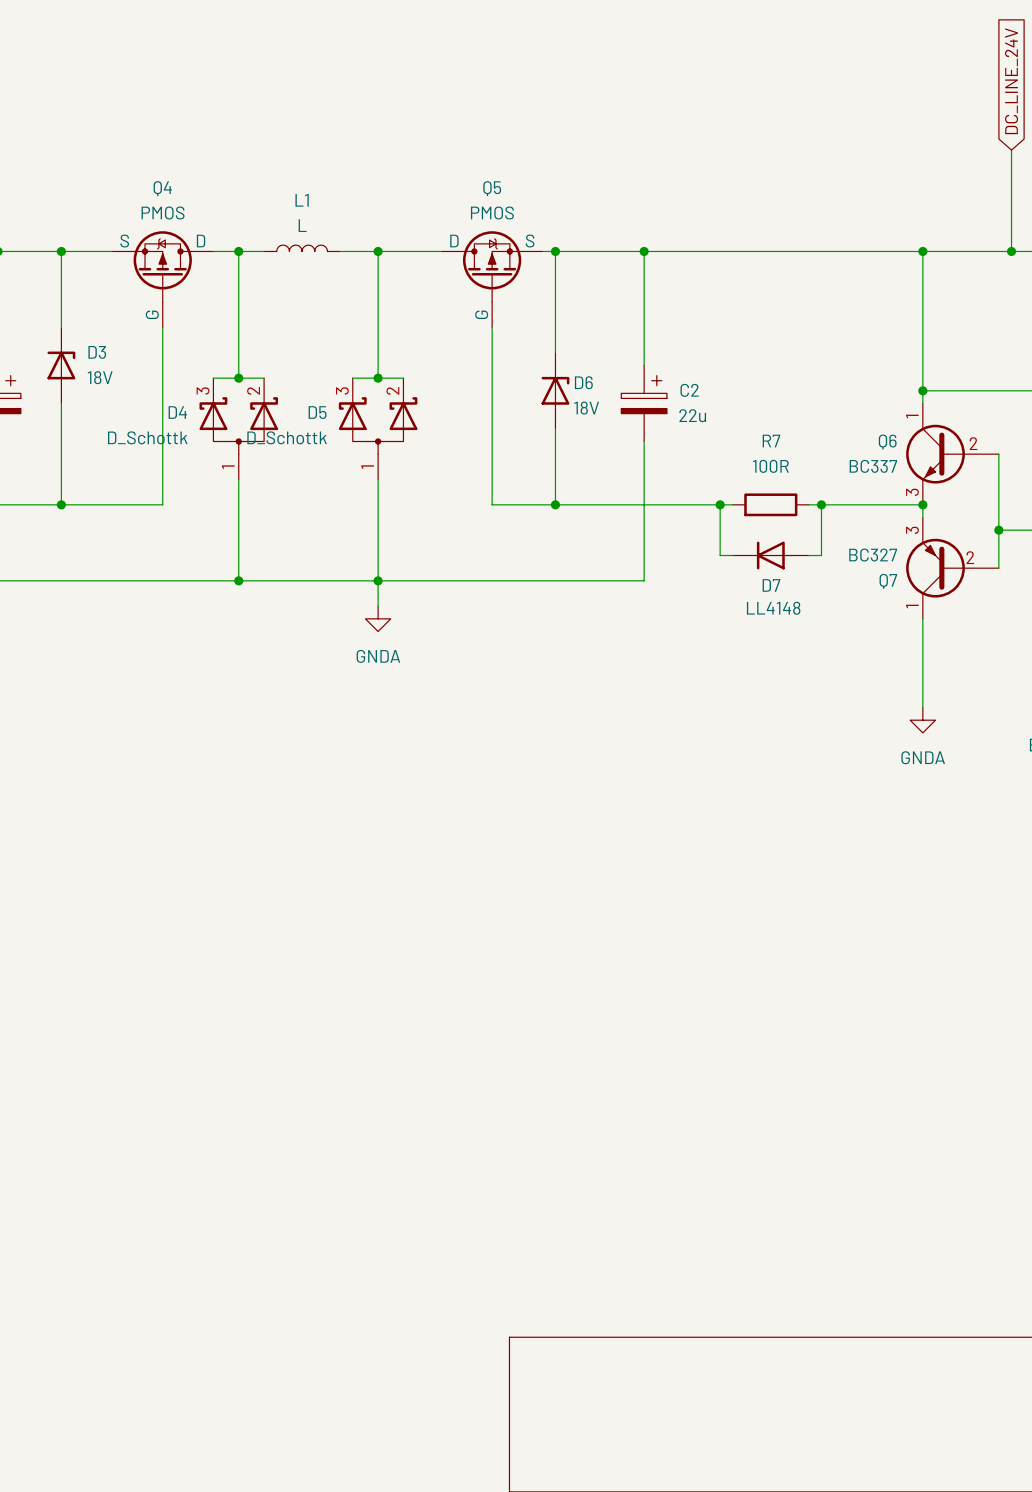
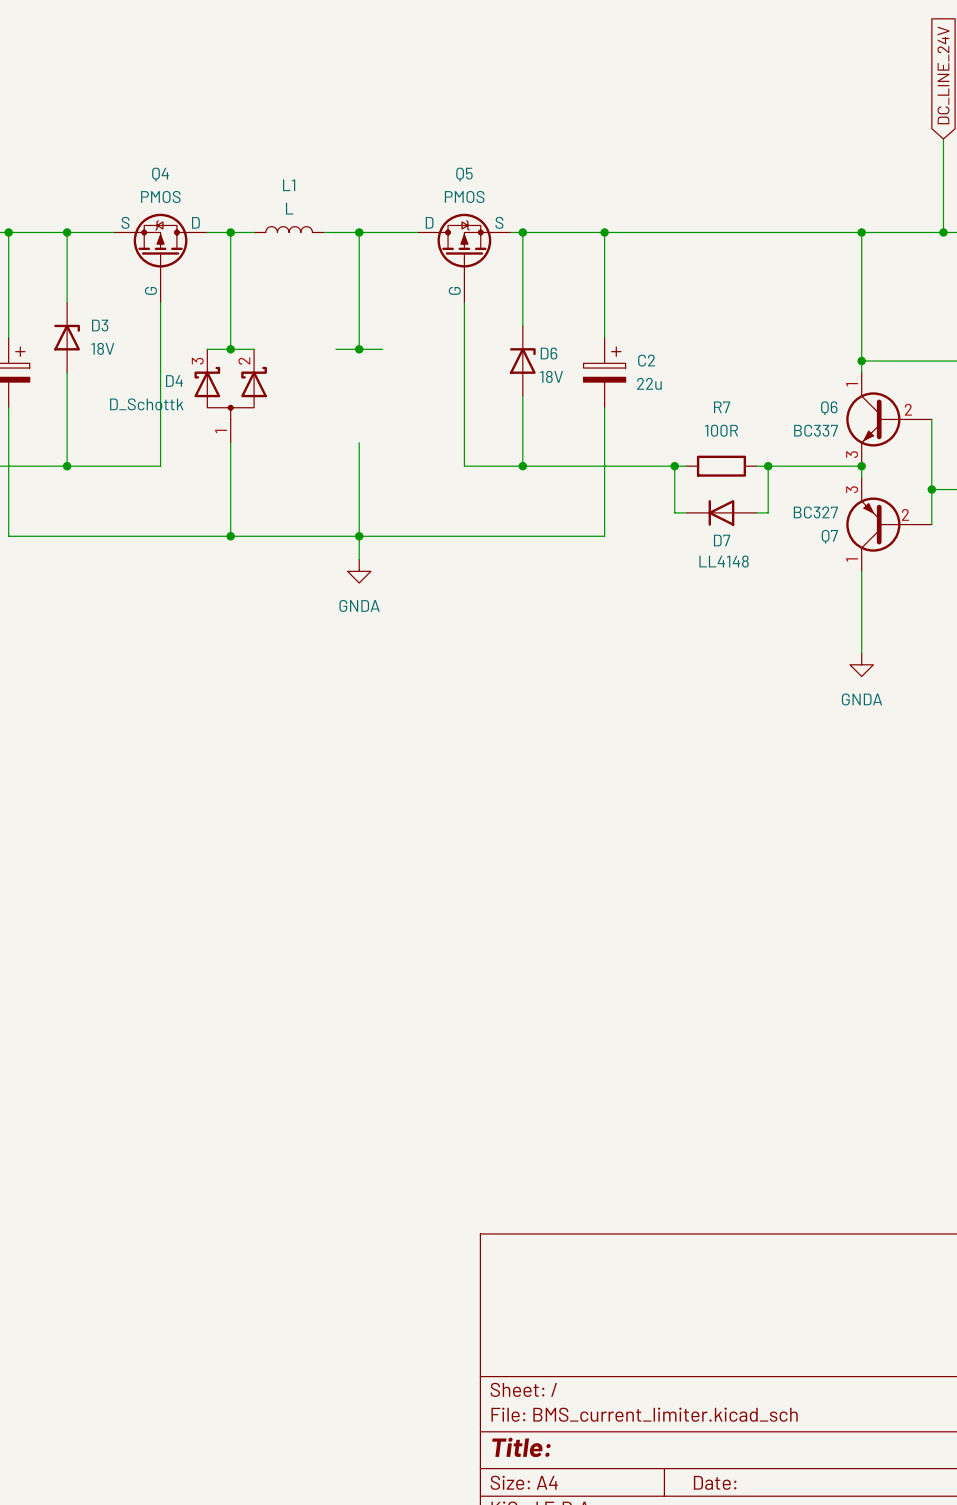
D5: D_Schottk (378, 428) -> none

